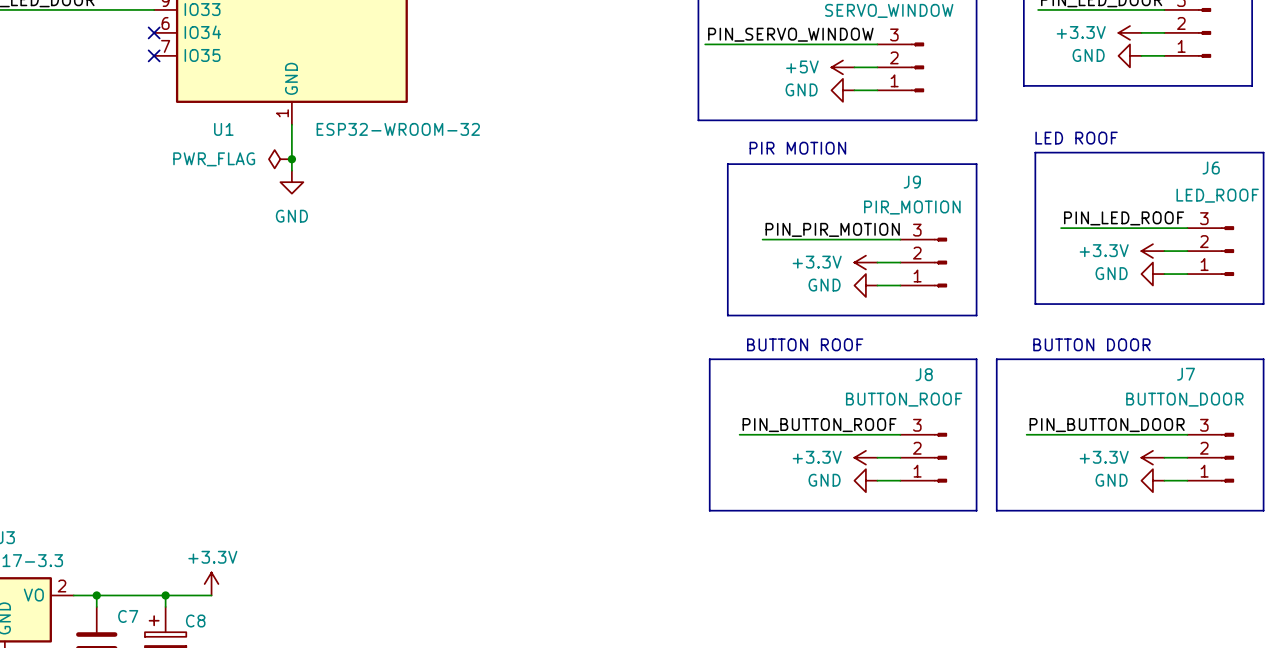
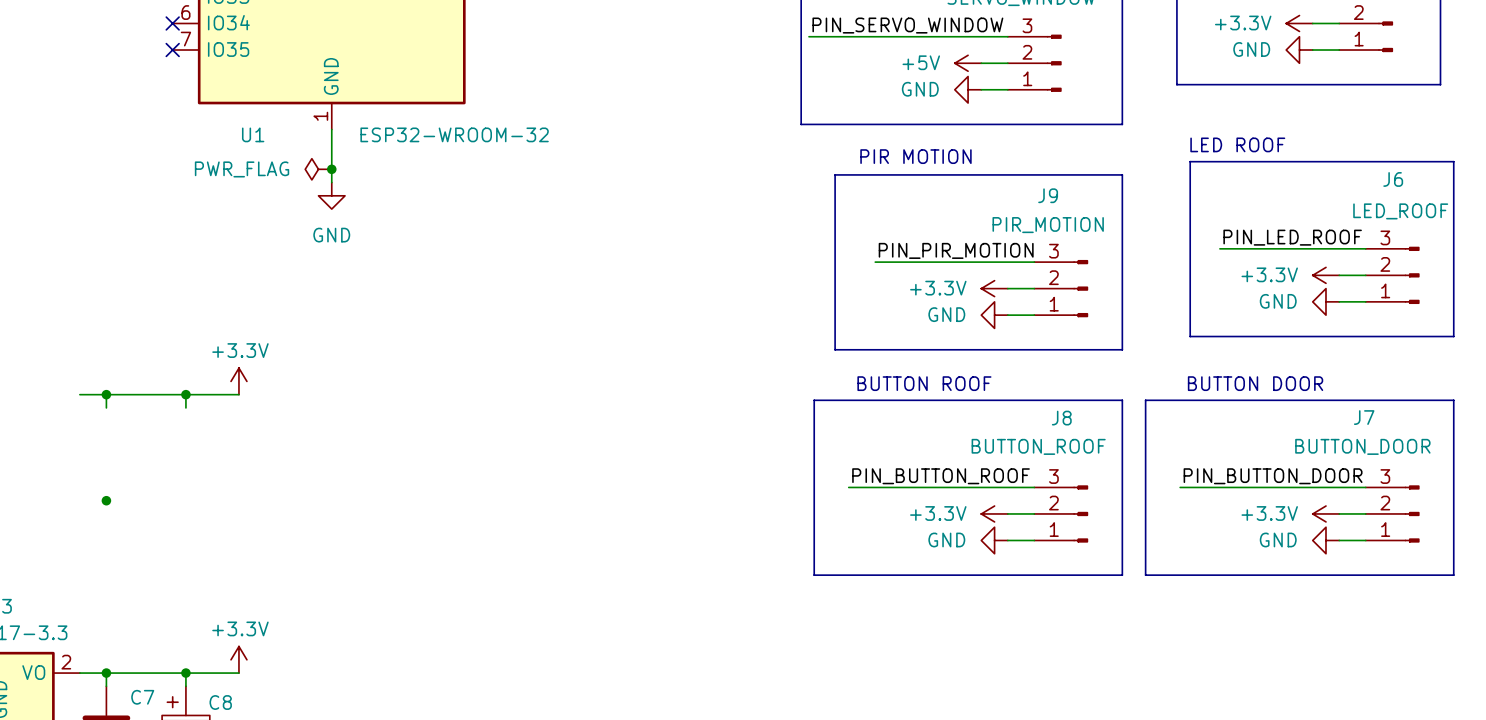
power symbol: none -> +3.3V (238, 381)
wire: none -> (79, 394) (238, 394)
wire: none -> (106, 394) (106, 407)
junction: none -> (106, 394)
wire: none -> (185, 394) (185, 407)
junction: none -> (185, 394)
junction: none -> (106, 500)

